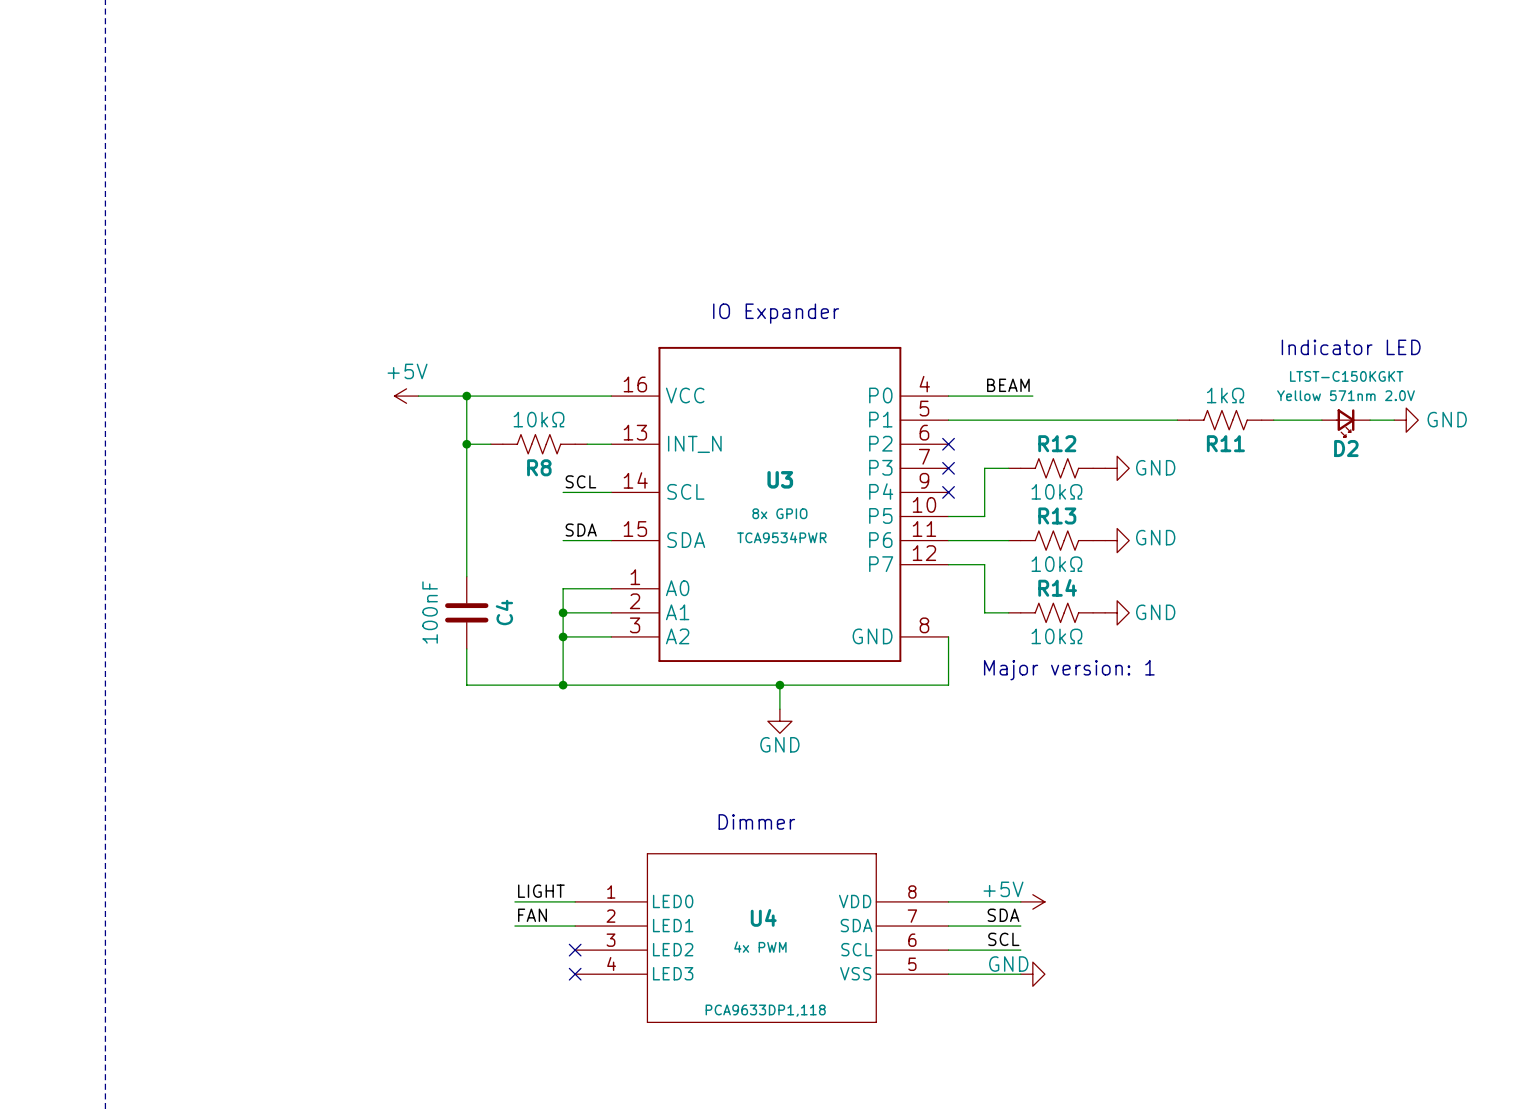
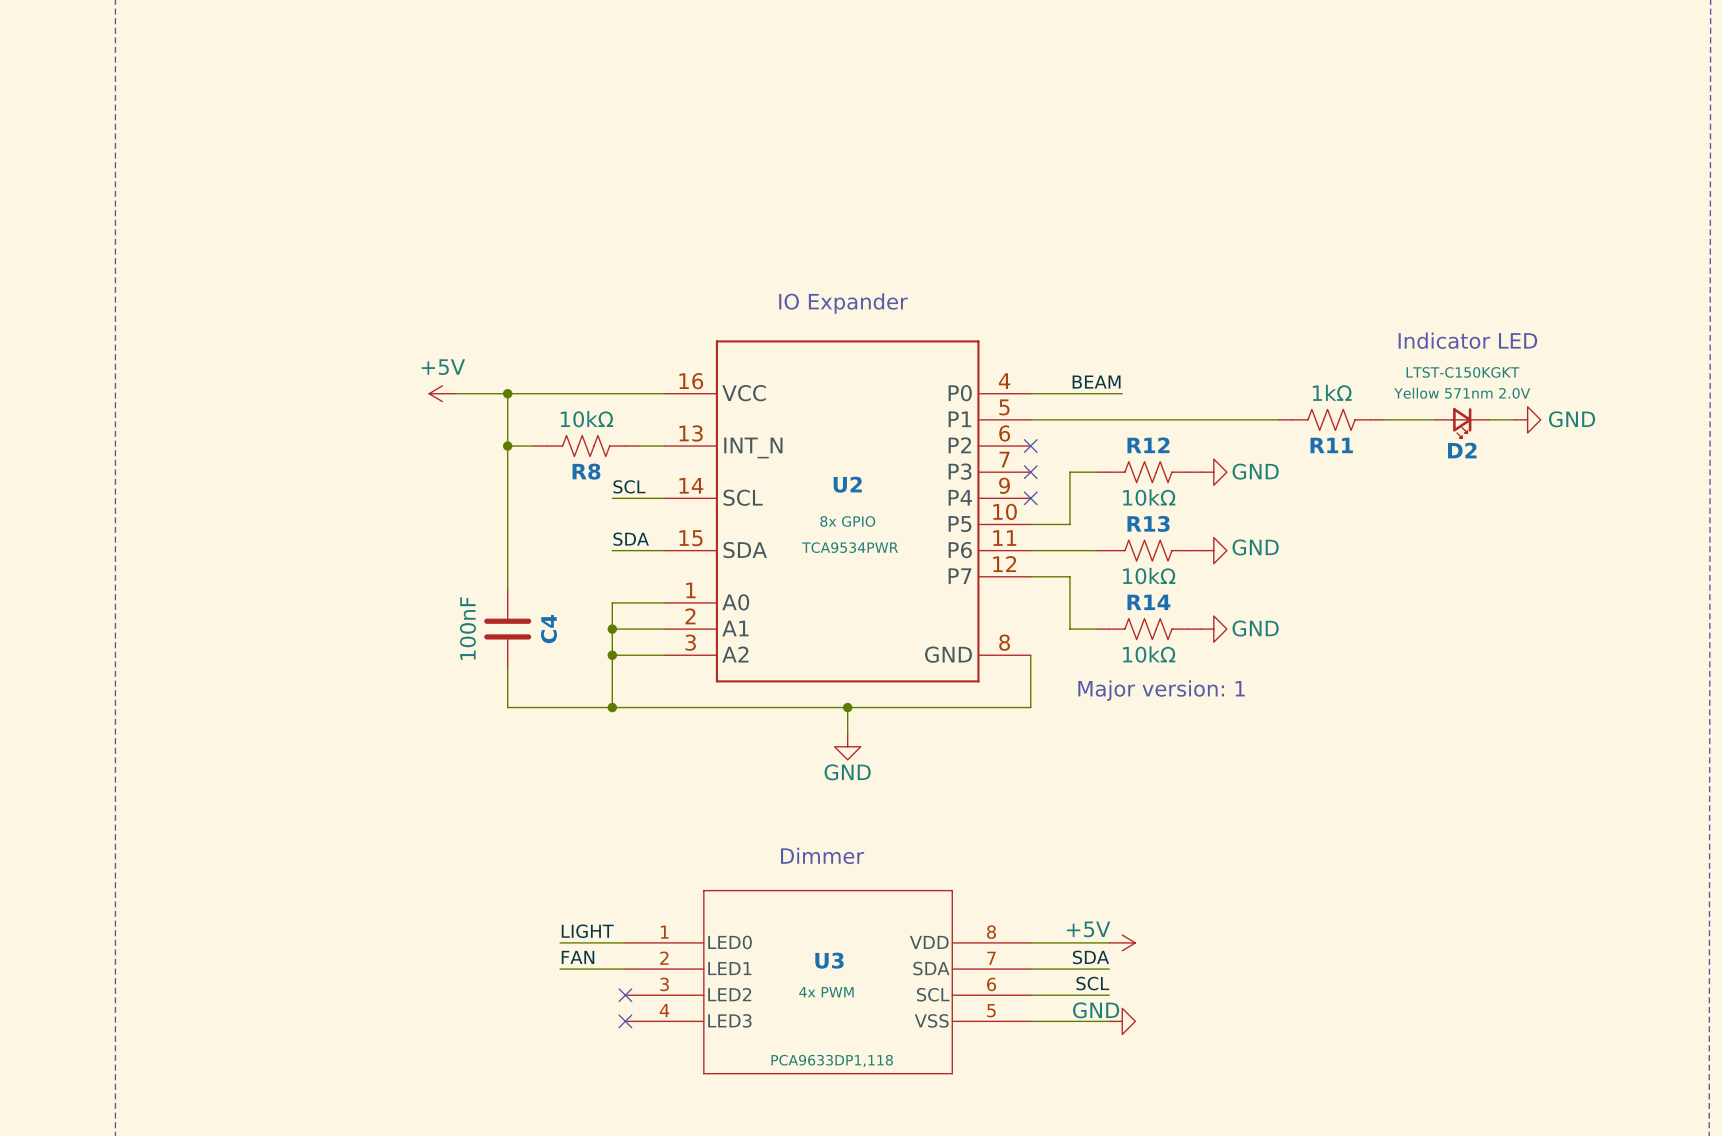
U3 name: U3 (780, 479) -> U2 (847, 484)
U4 name: U4 (763, 917) -> U3 (829, 960)

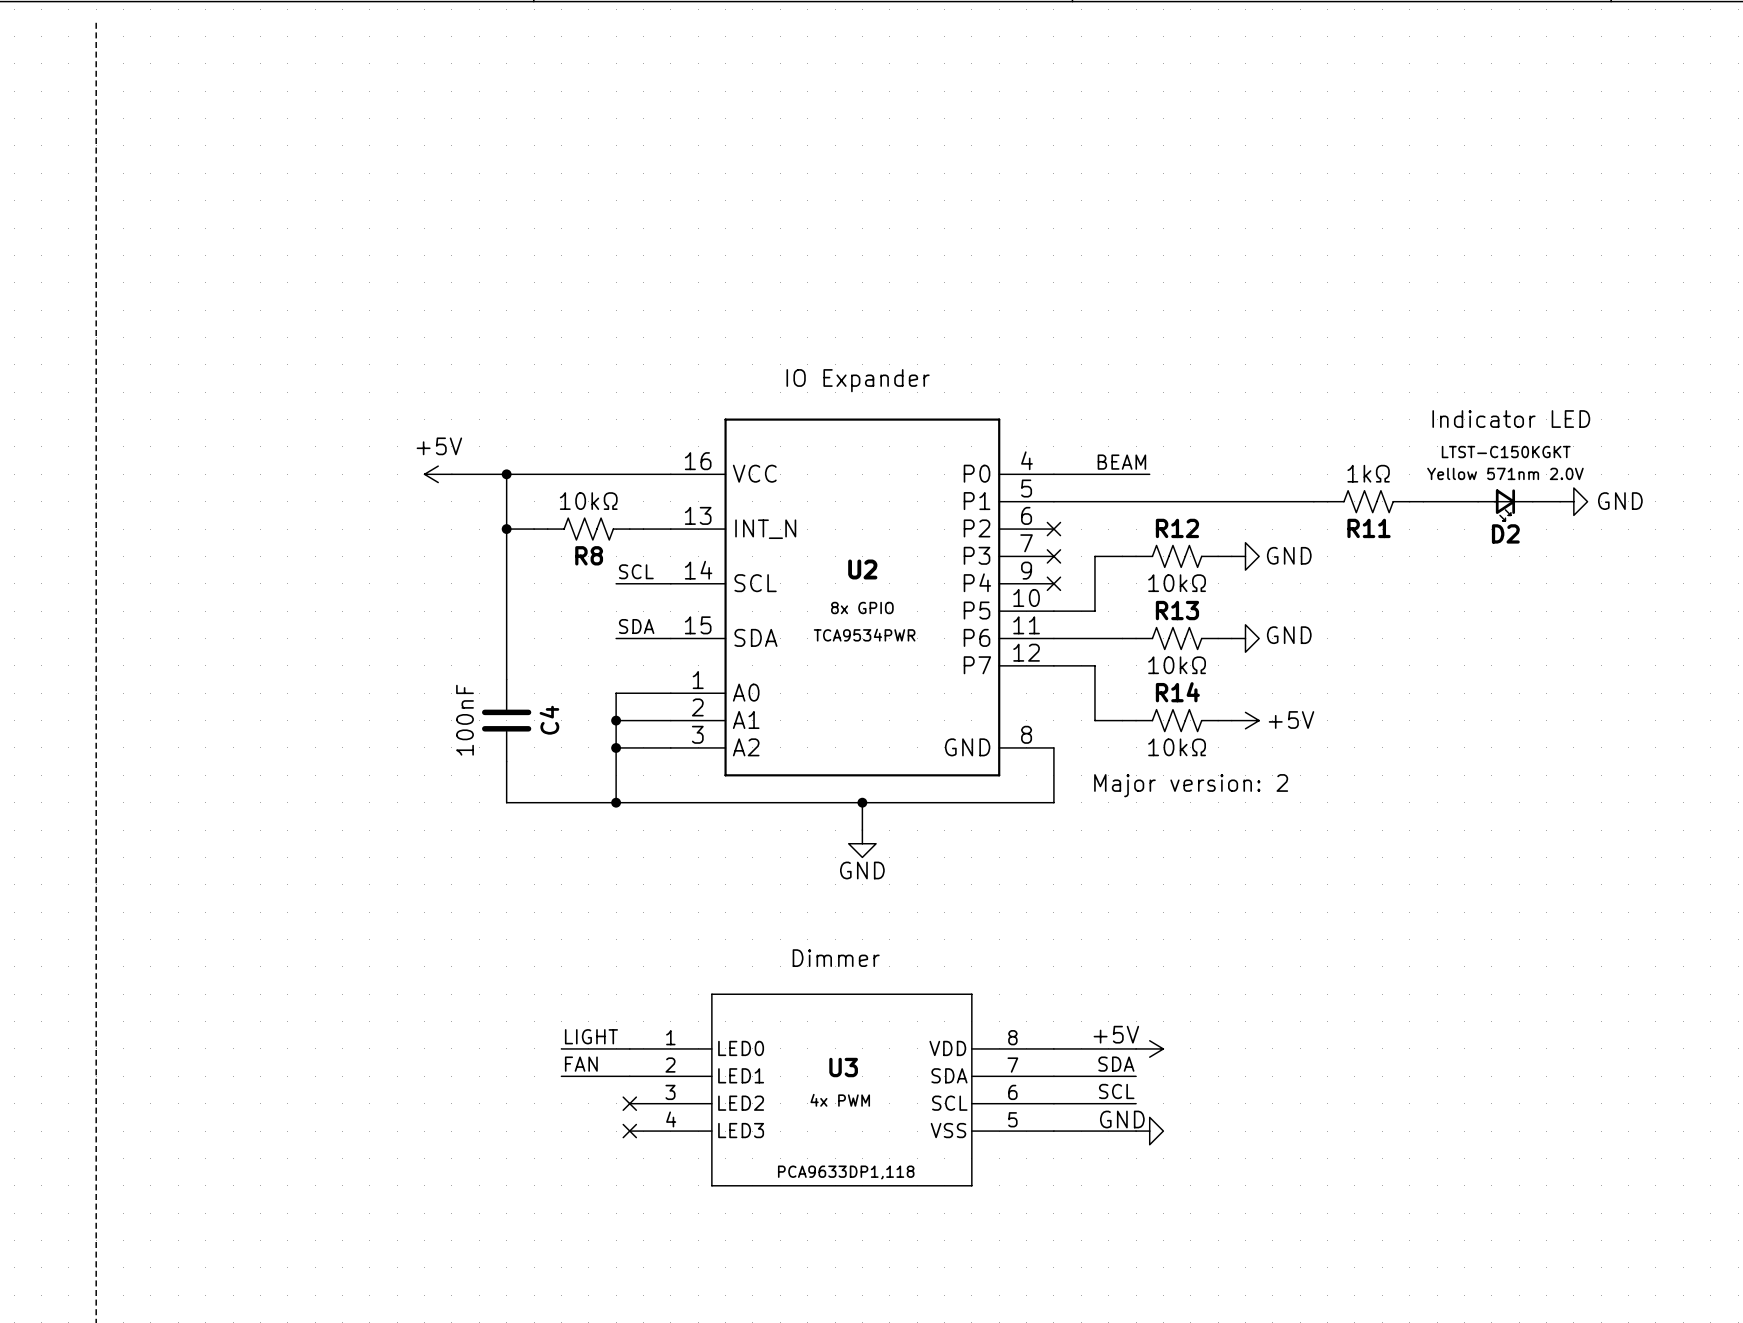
power symbol: GND (1213, 629) -> +5V (1245, 720)
text: Major version: 1 (1161, 690) -> Major version: 2 (1191, 785)

